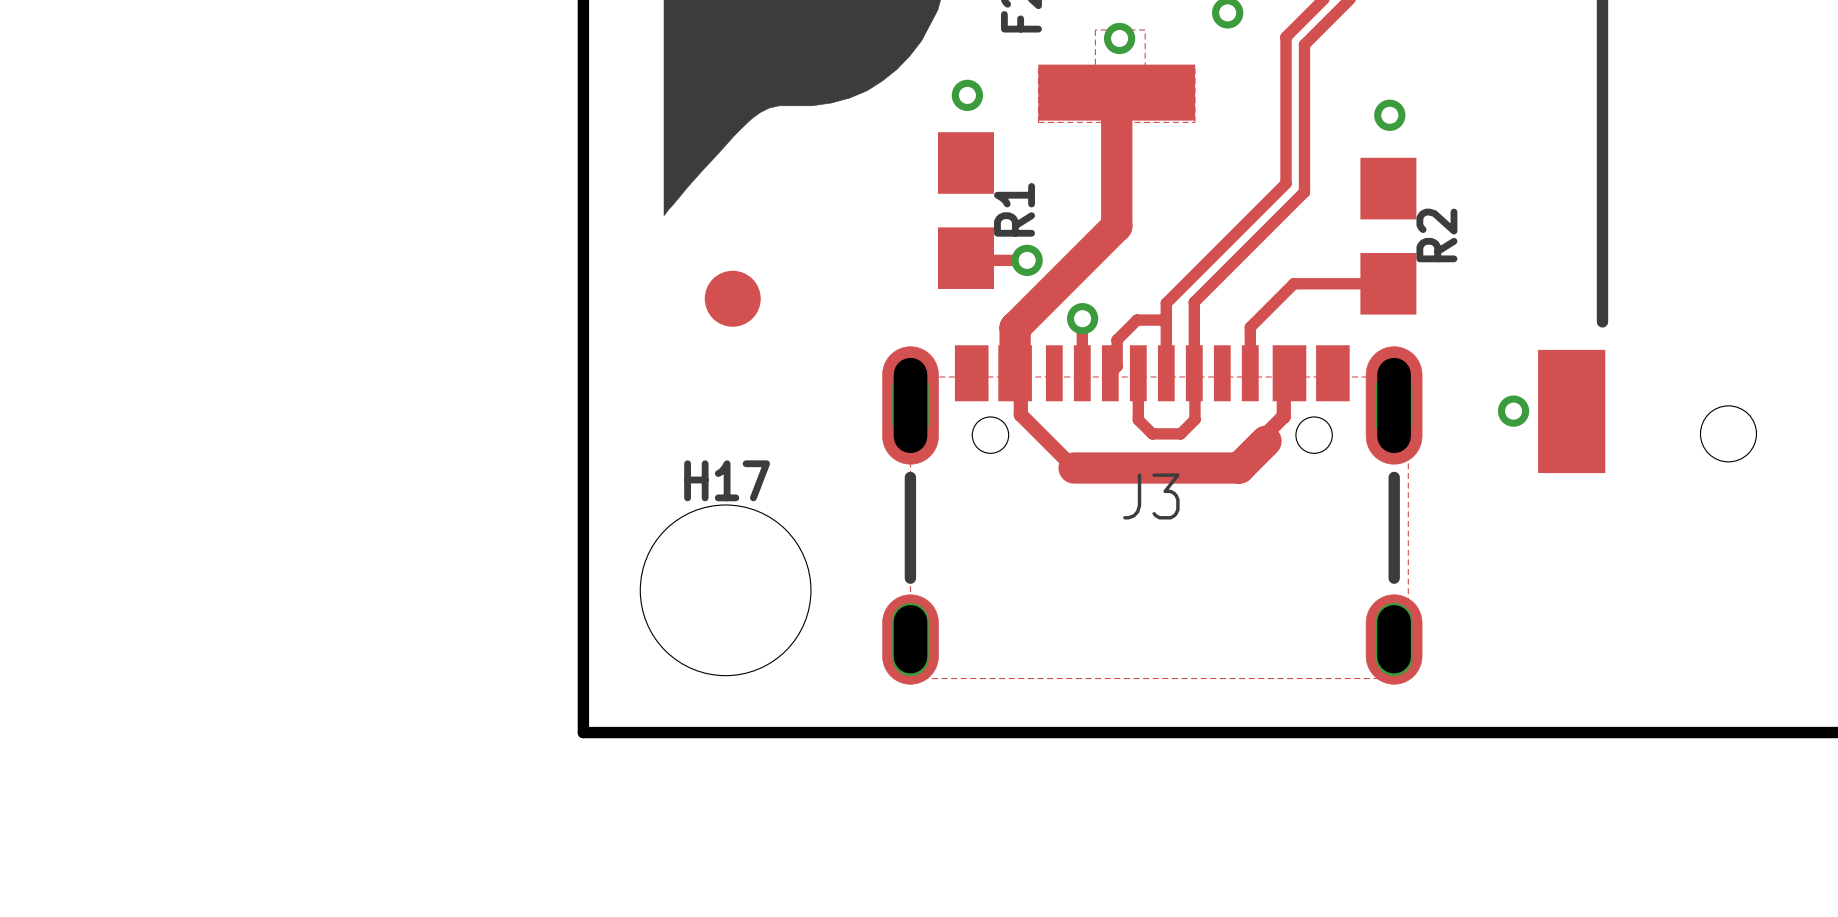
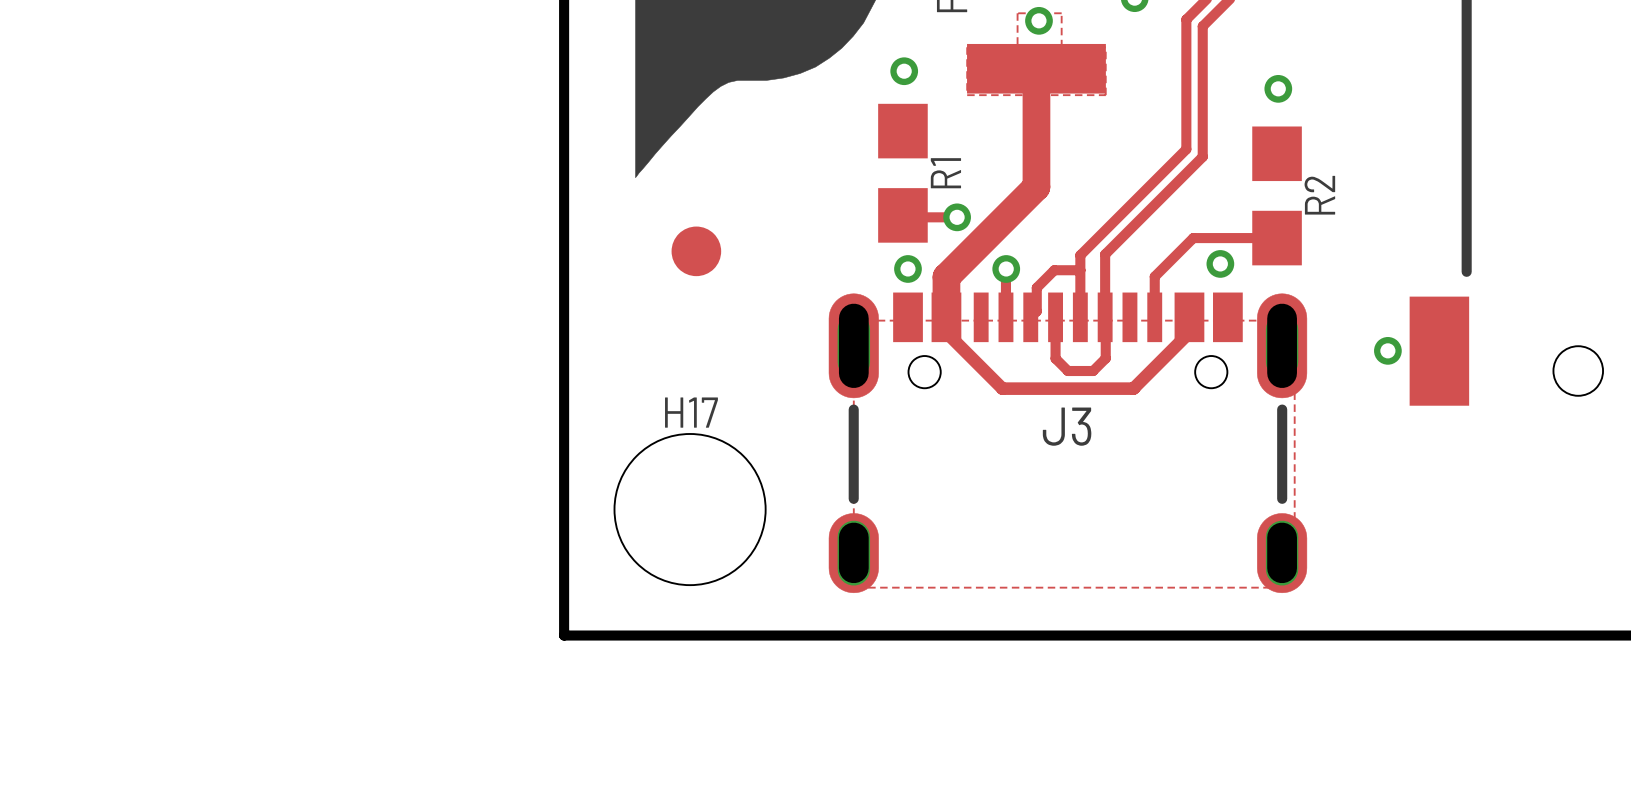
via: none -> (1220, 263)
via: none -> (907, 268)
track: none -> (946, 317) (946, 332) (1002, 388) (1133, 388) (1189, 332) (1189, 317)
track: (1020, 378) (1020, 414) (1074, 468) (1239, 468) (1266, 441) (1266, 434) (1283, 416) (1283, 378) -> none

